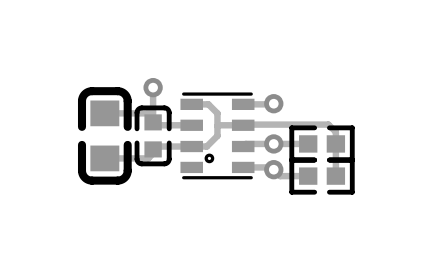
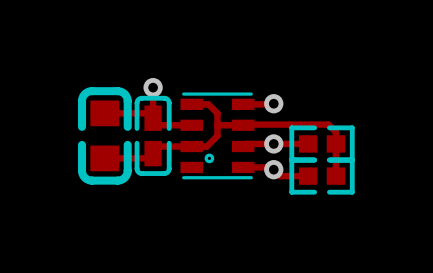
part footprint: [134, 105, 172, 167] -> [134, 95, 172, 176]

